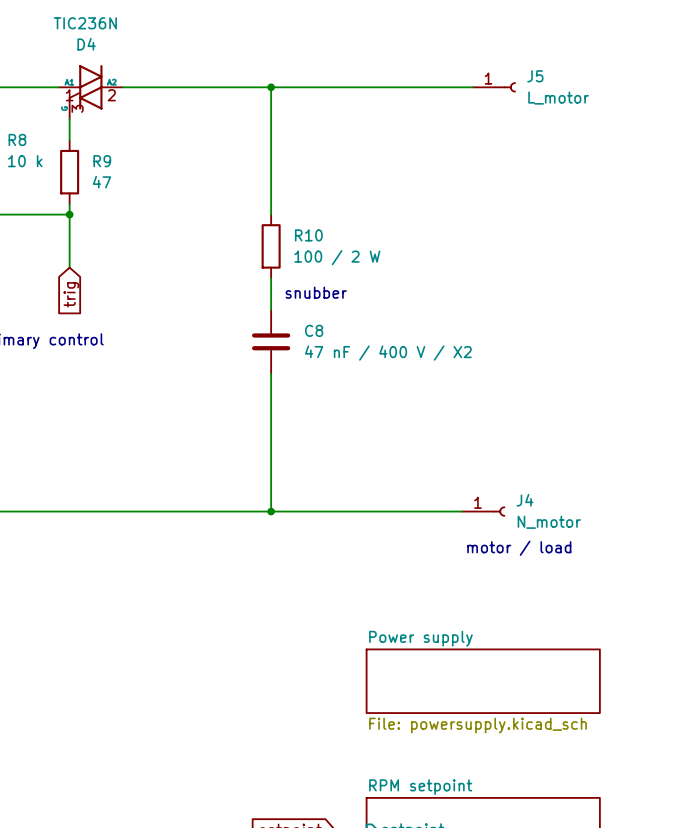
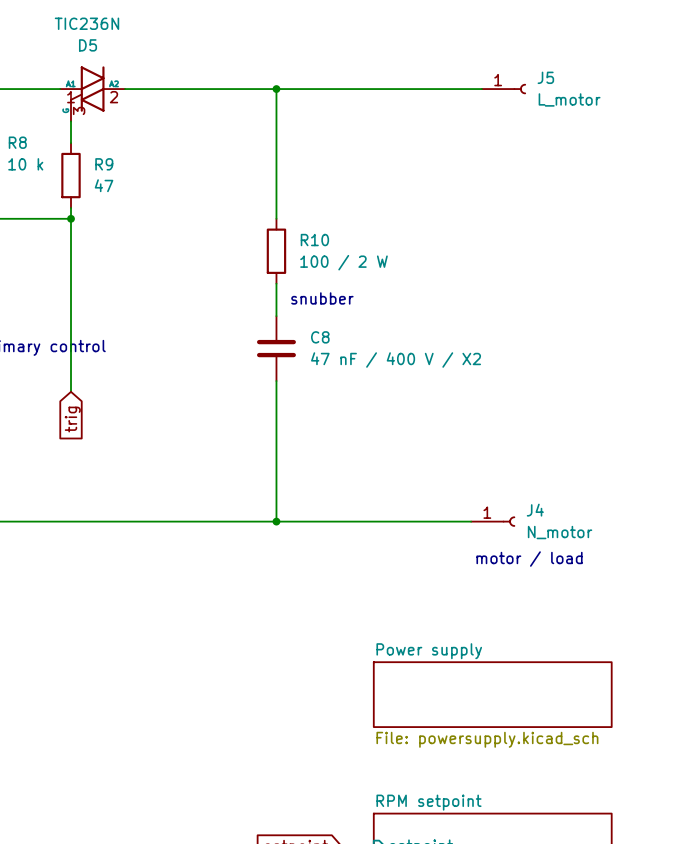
D4 name: D4 (86, 44) -> D5 (88, 45)
wire: none -> (71, 272) (71, 391)
global label position: trig (71, 294) -> trig (72, 419)

